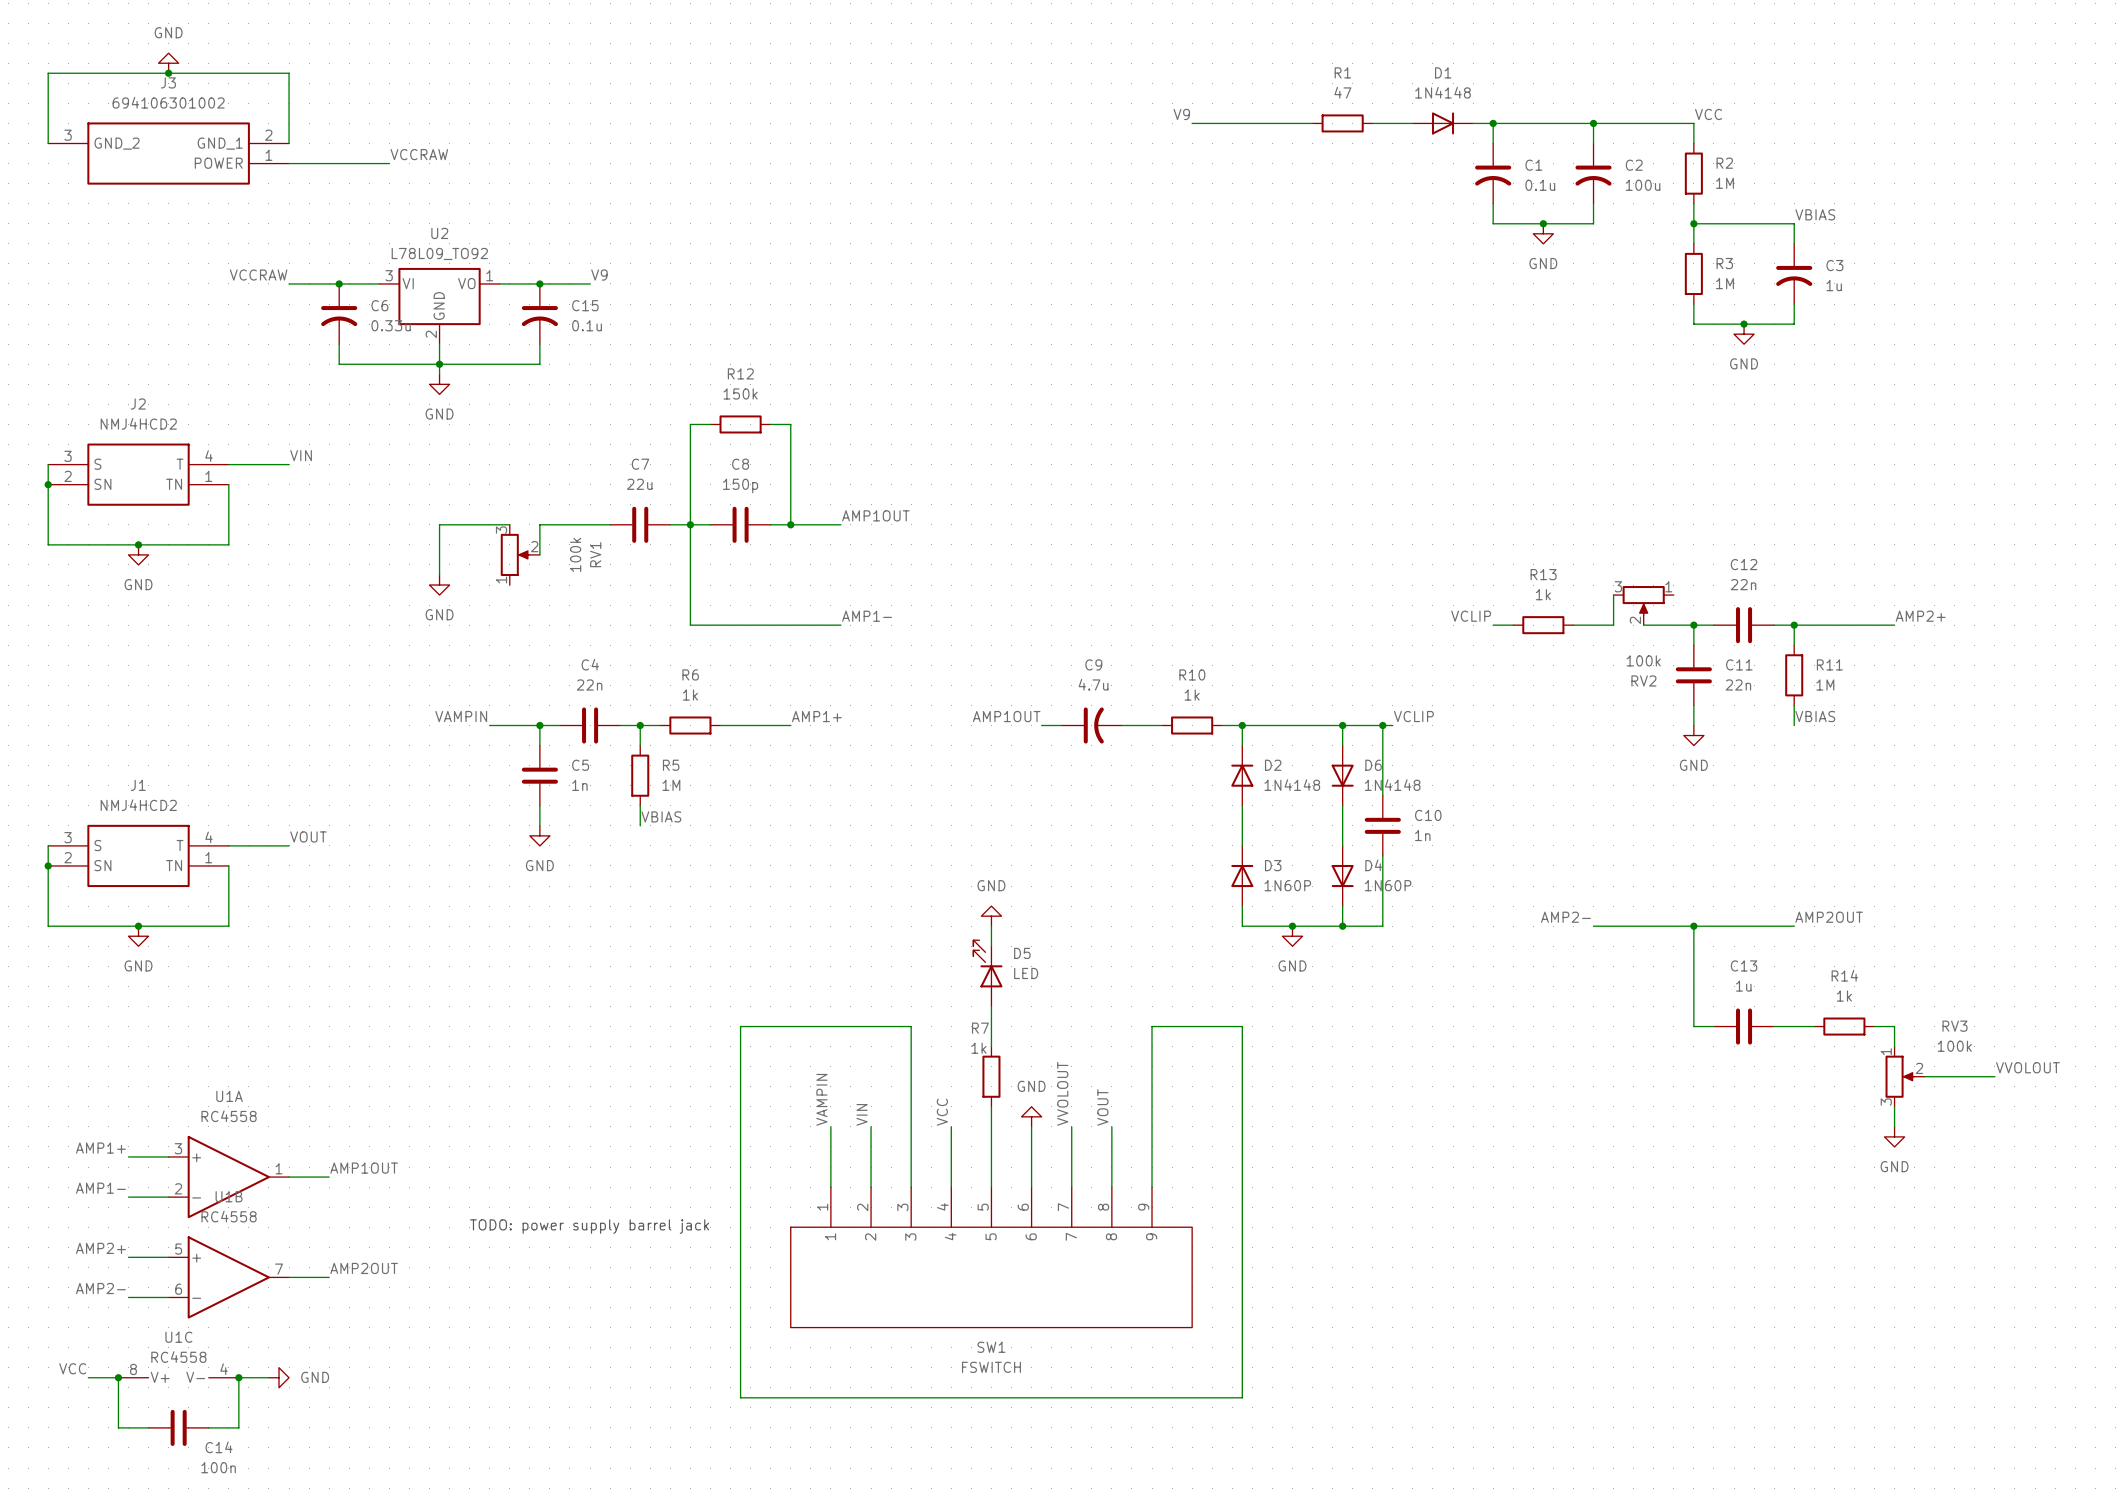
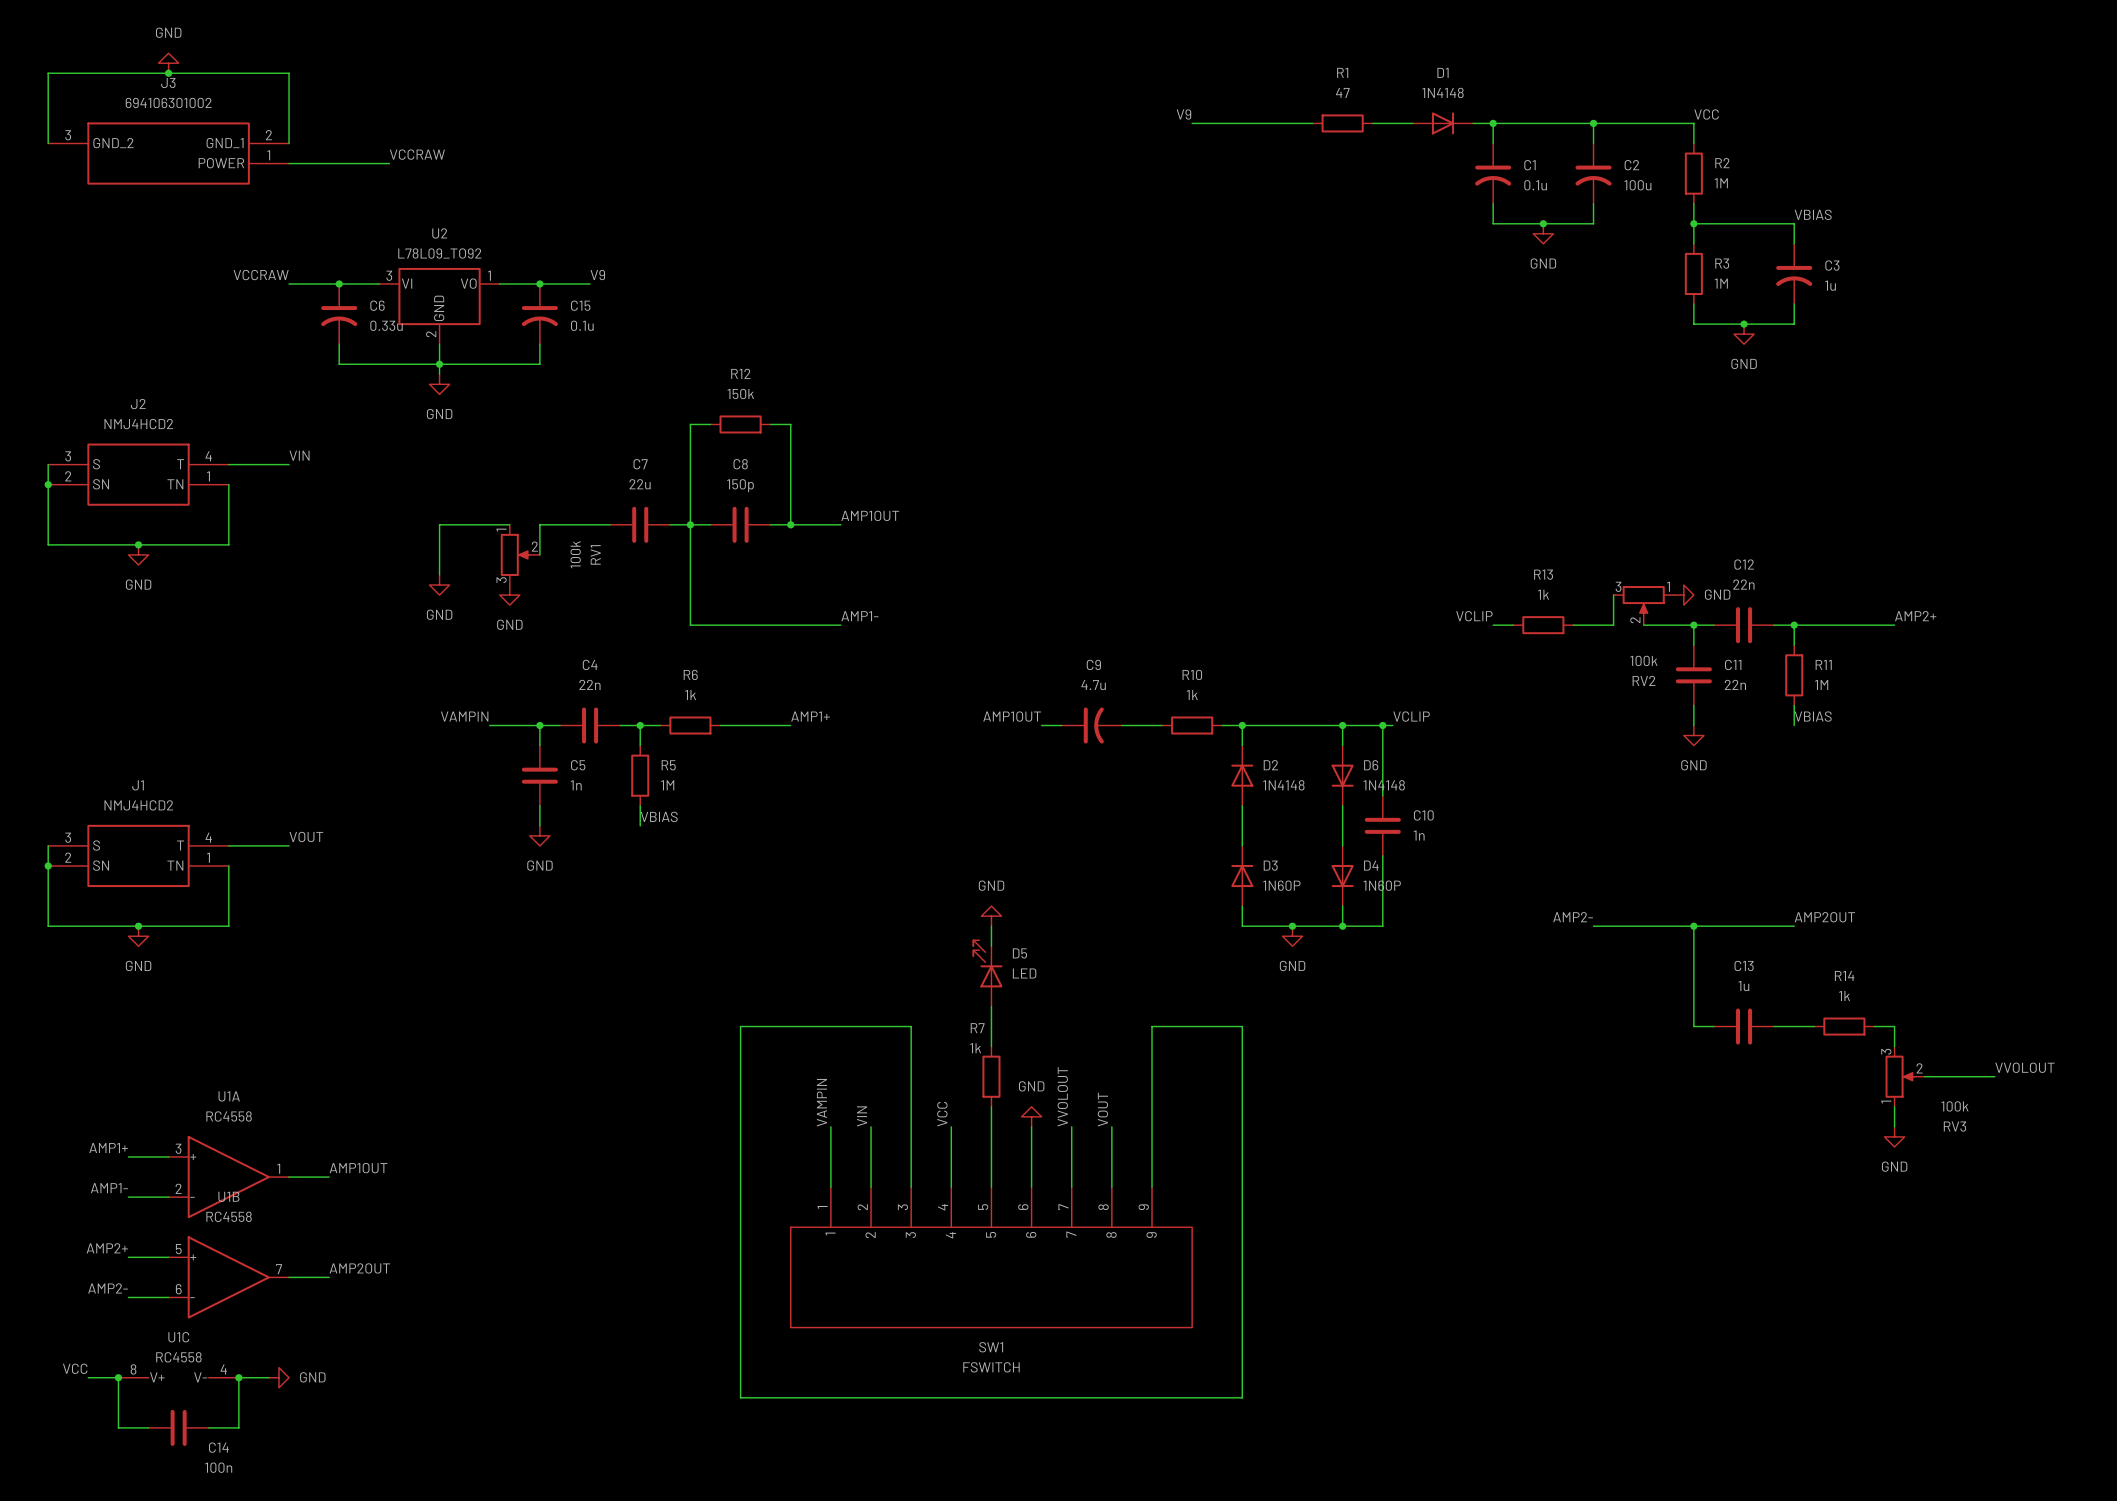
RV1 flip: as is (515, 554) -> up-down (515, 554)
power symbol: none -> GND (509, 595)
power symbol: none -> GND (1683, 595)
RV3 flip: as is (1900, 1076) -> up-down (1900, 1076)
text: TODO: power supply barrel jack (589, 1226) -> none

